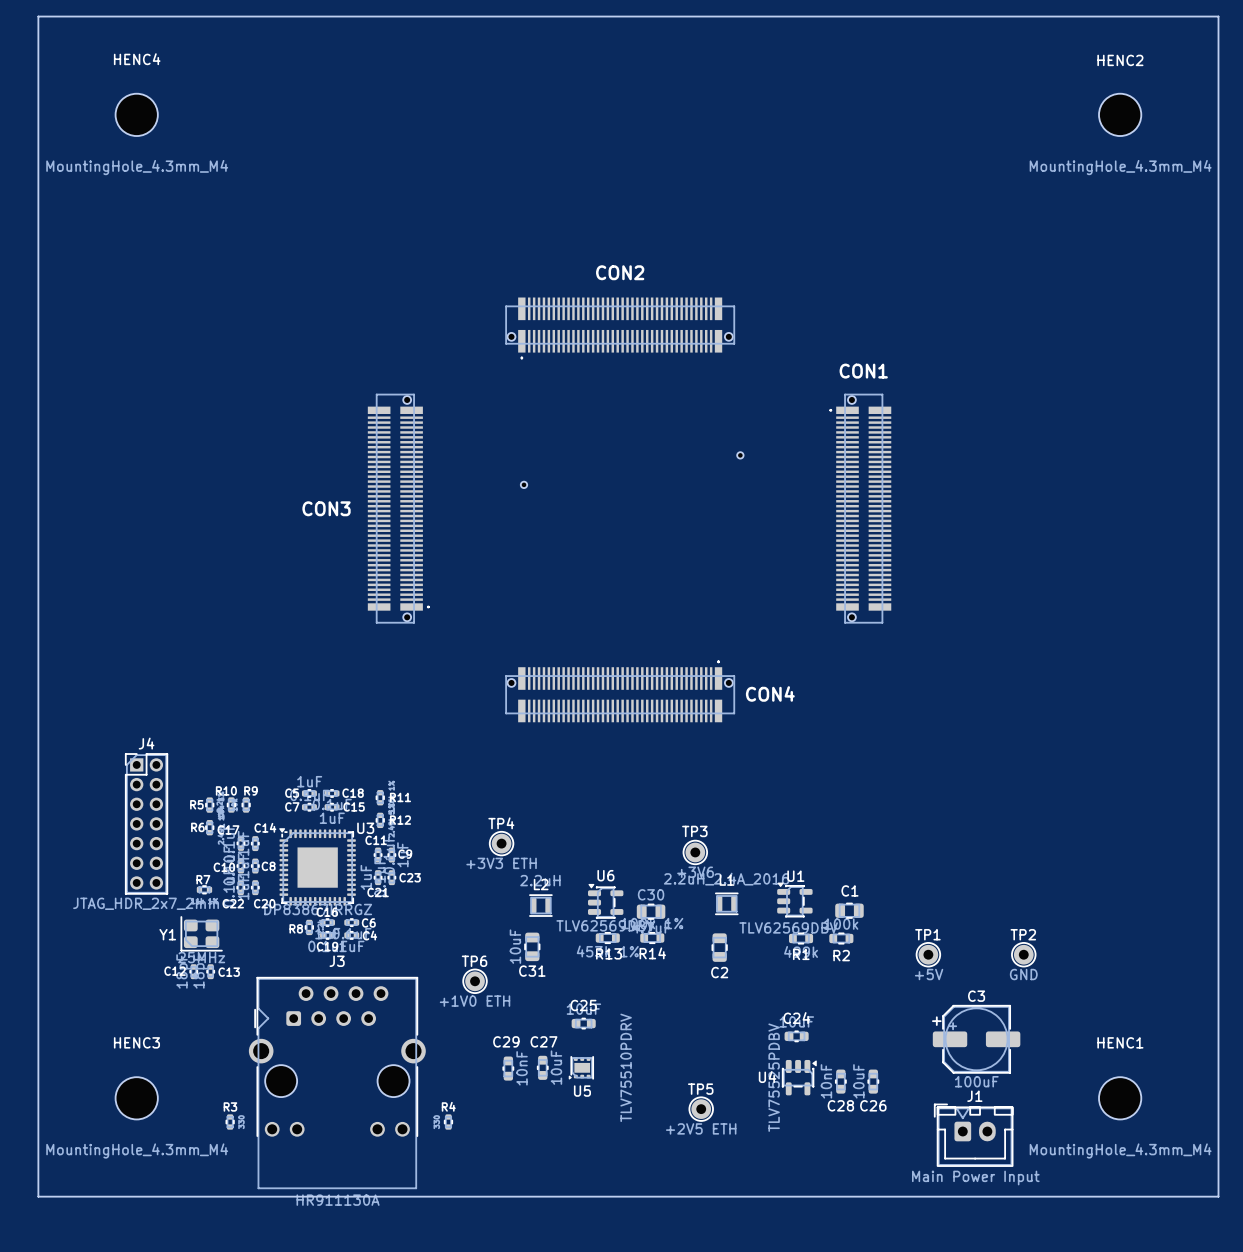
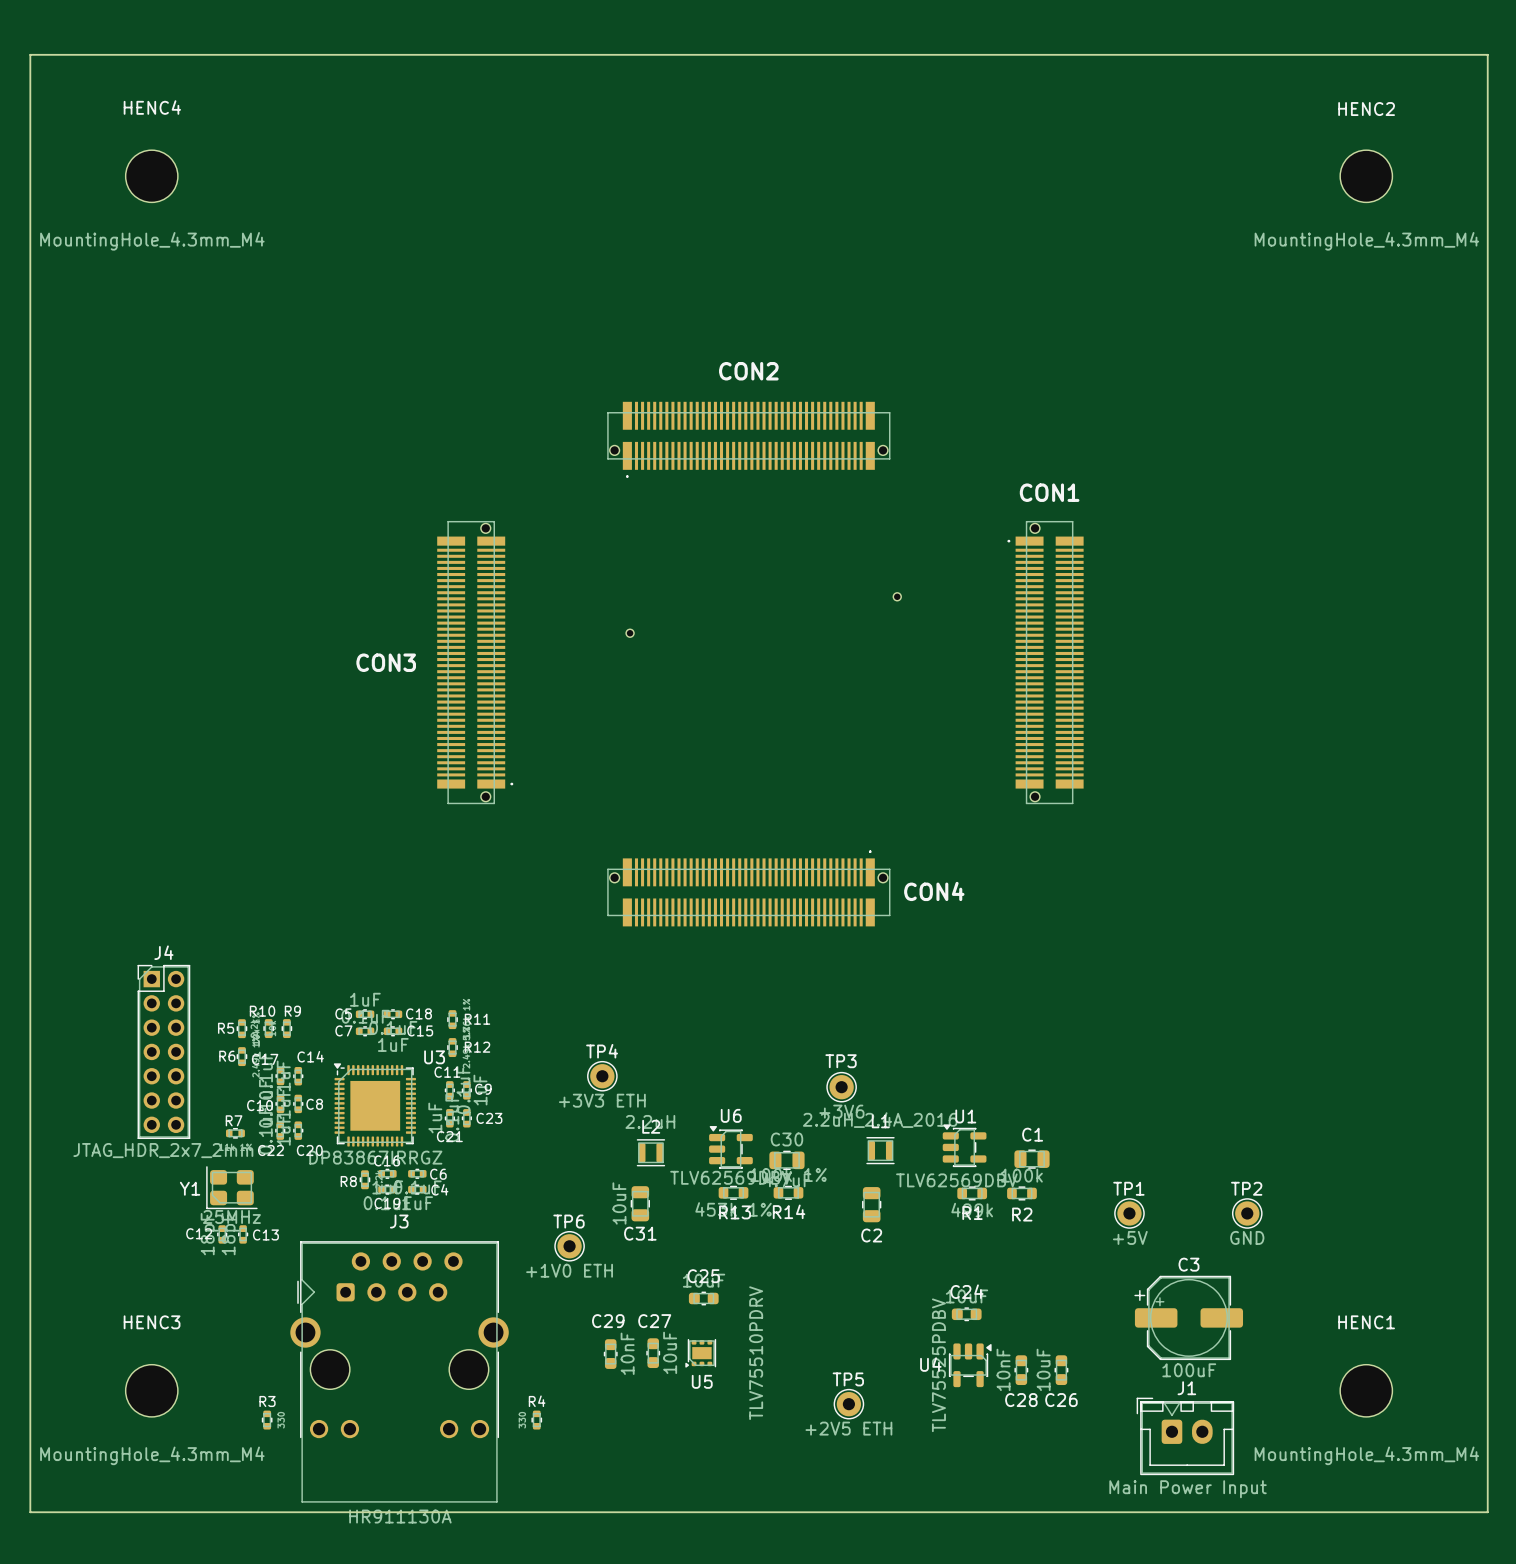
U3 footprint: [279, 828, 356, 906] -> [333, 1063, 416, 1147]

